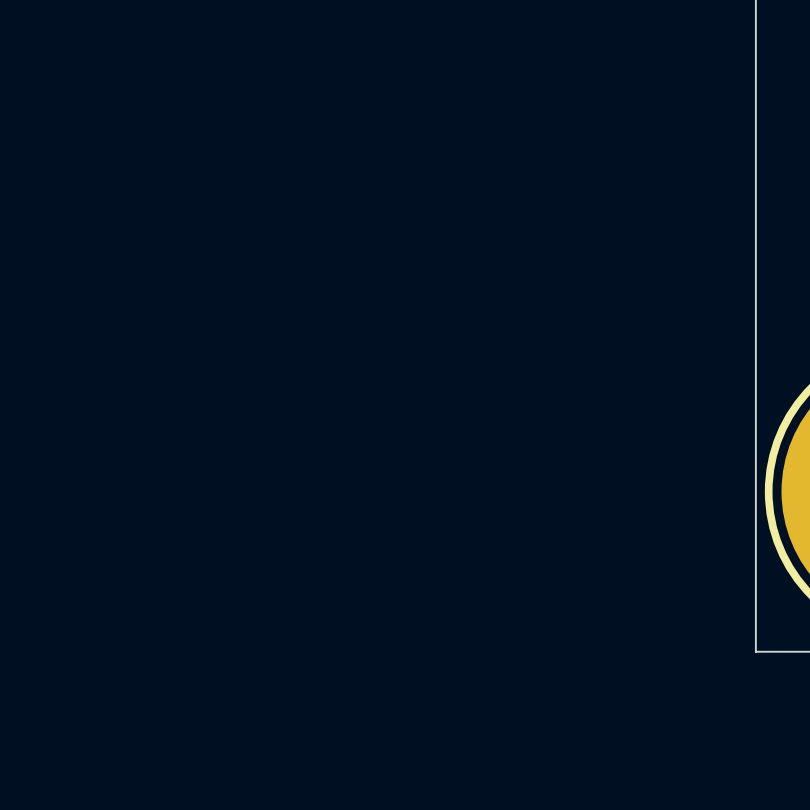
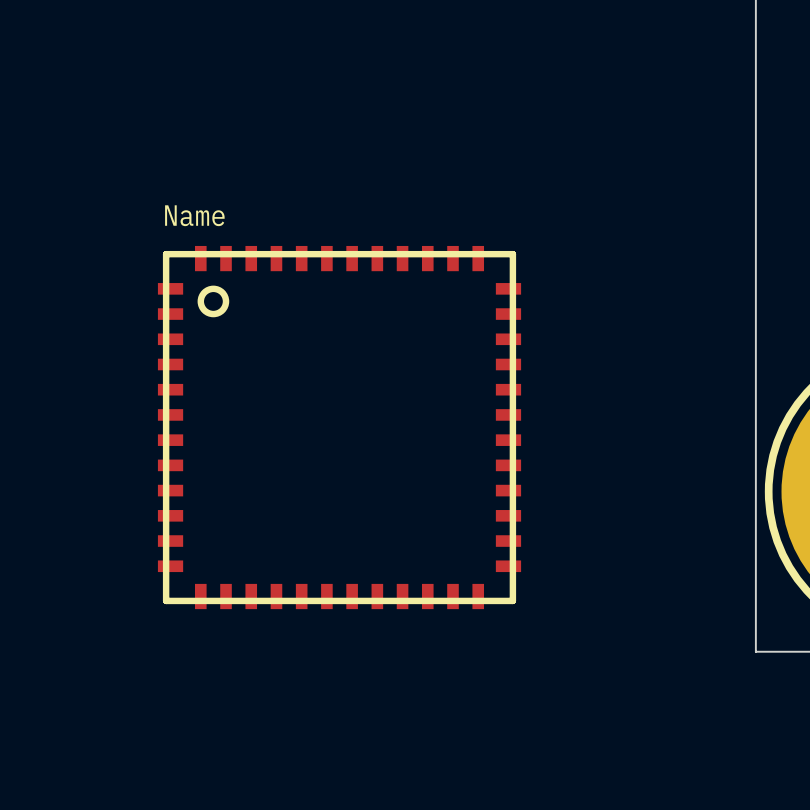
part: none -> (339, 427)

